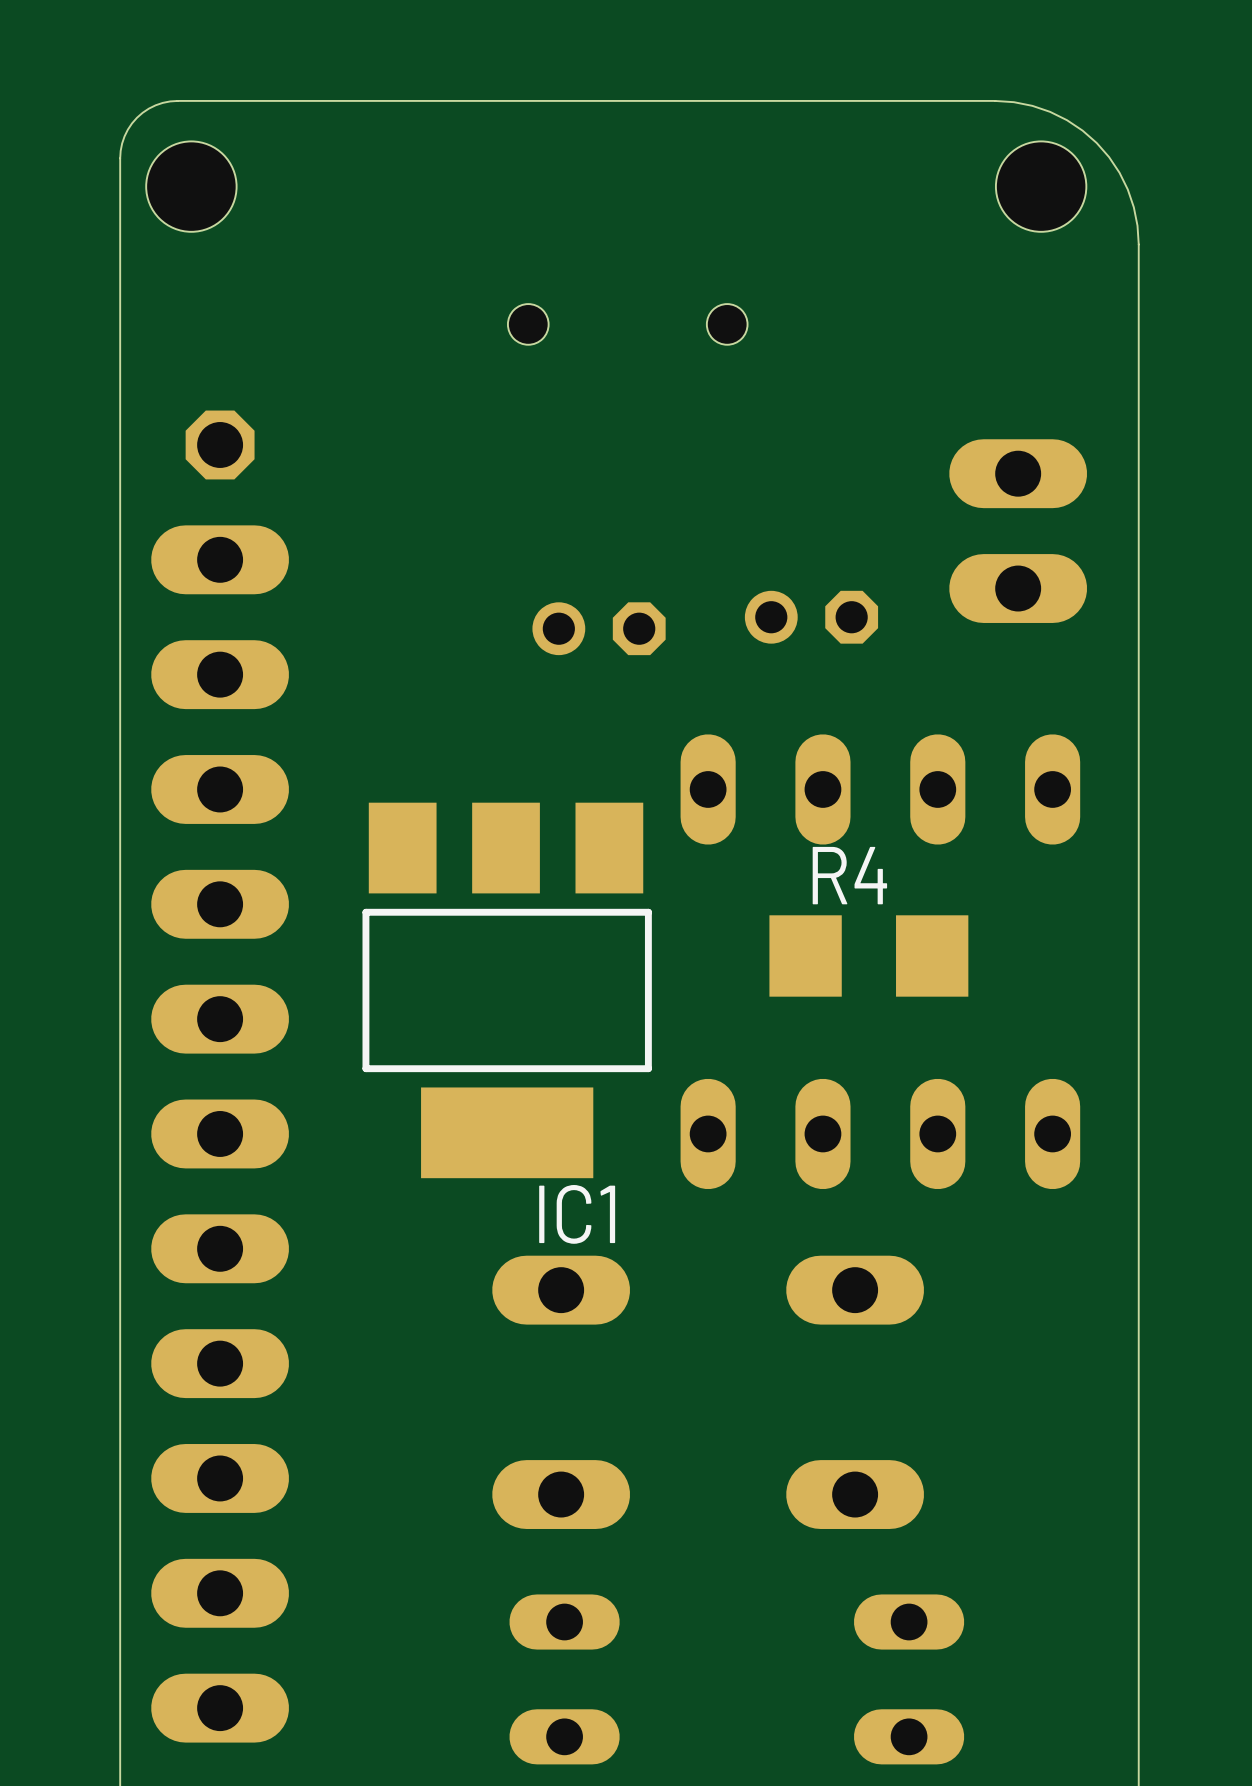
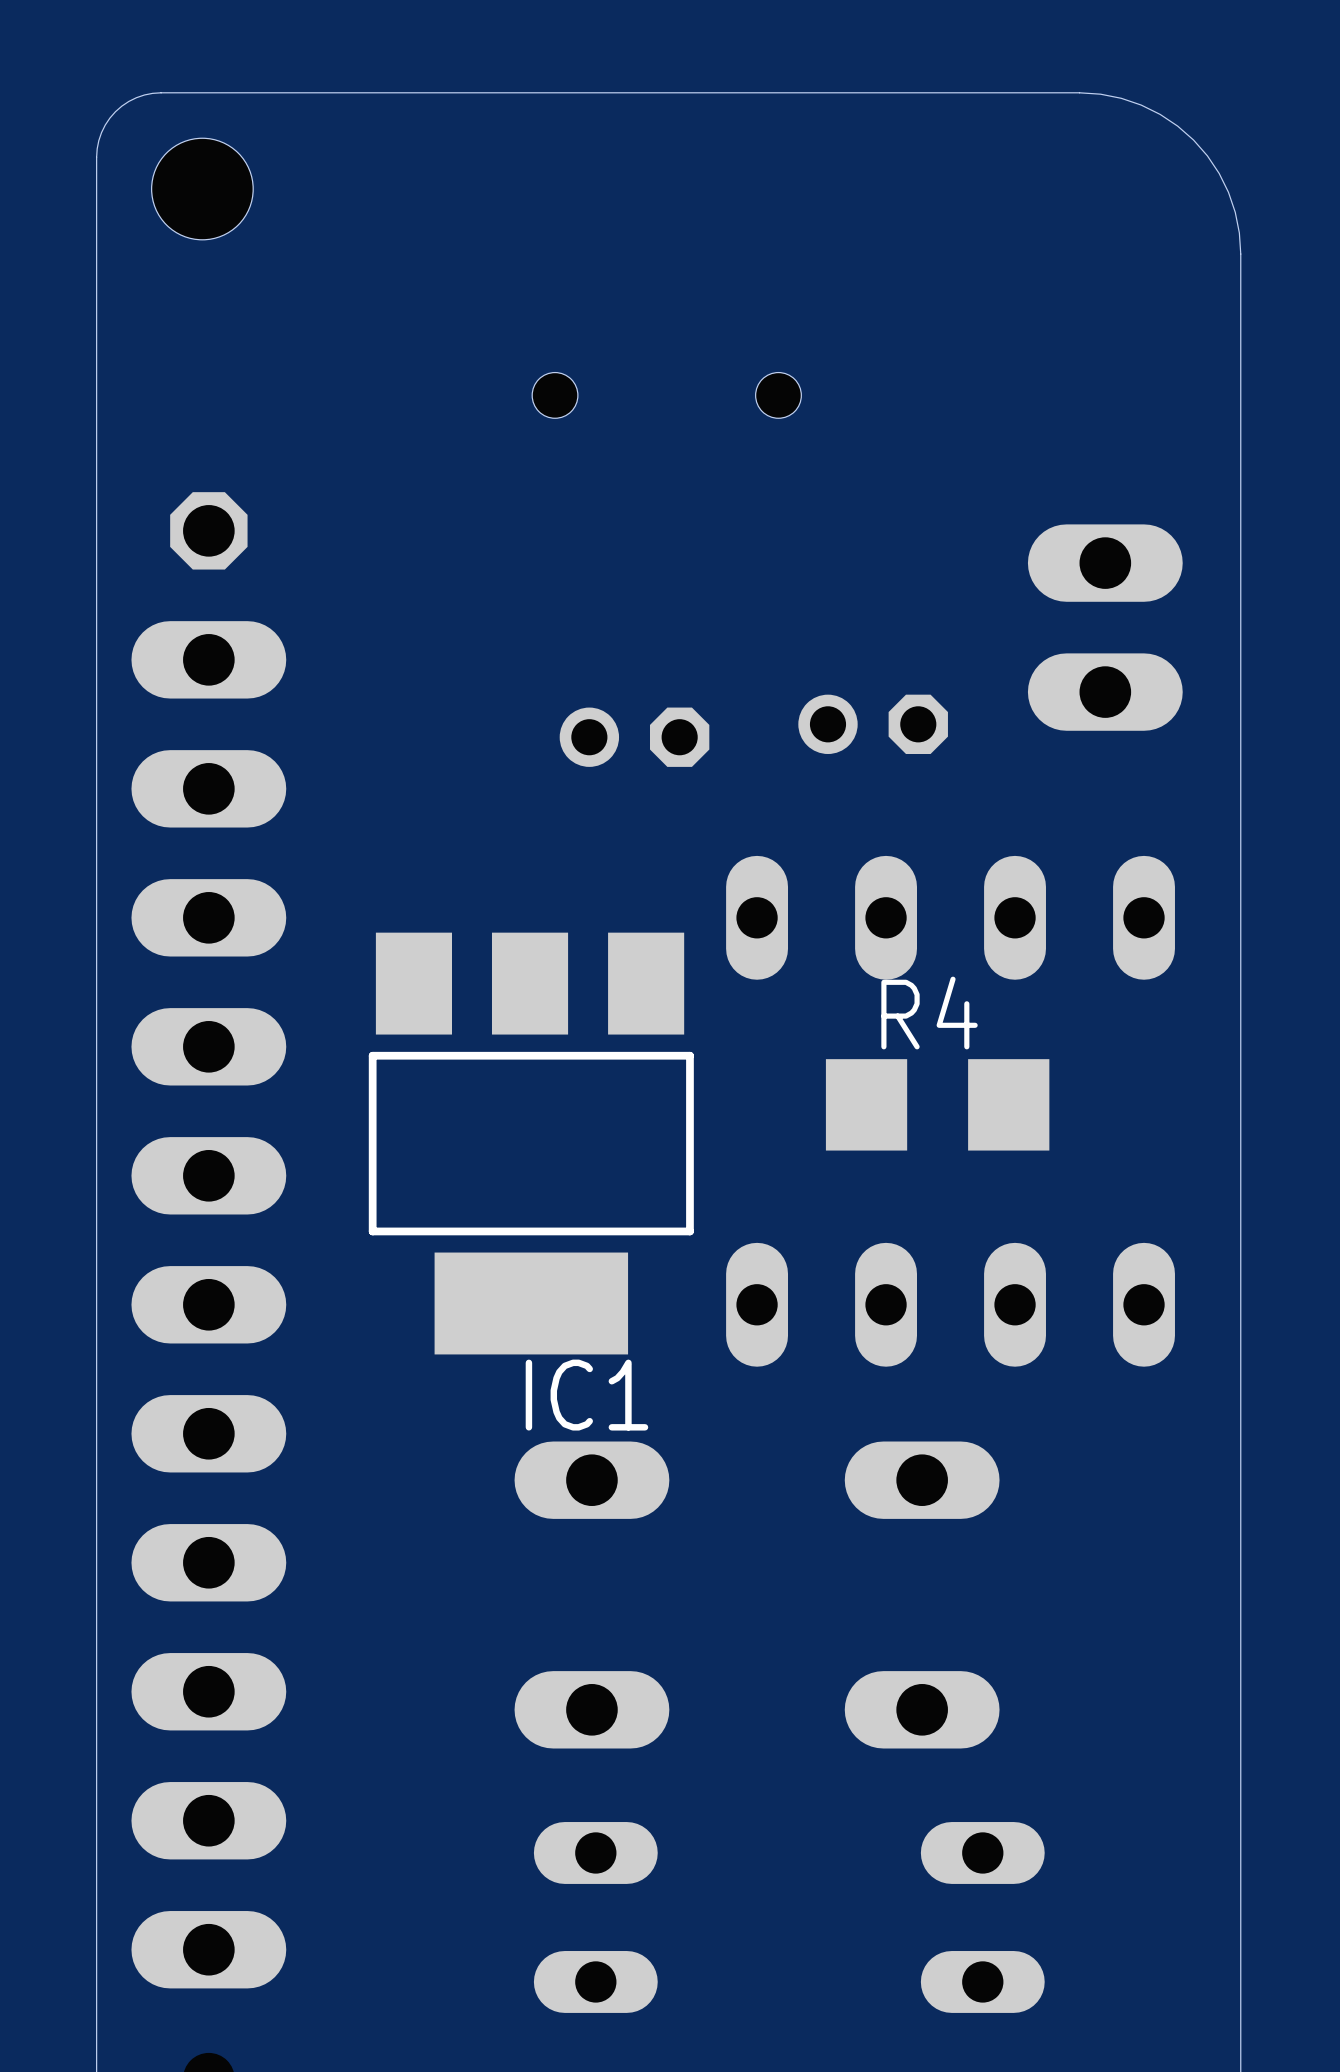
board edge: (120, 158) (124, 136) (137, 117) (155, 105) (177, 100) (1013, 102) (1050, 111) (1066, 120) (1096, 142) (1119, 172) (1127, 189) (1133, 207) (1138, 244) -> (96, 208) (96, 157) (101, 132) (109, 118) (121, 106) (136, 97) (152, 93) (1100, 94) (1141, 105) (1177, 126) (1193, 140) (1219, 173) (1235, 212) (1239, 232) (1240, 305)
hole position: (191, 186) -> (202, 189)
hole: (1041, 186) -> none

